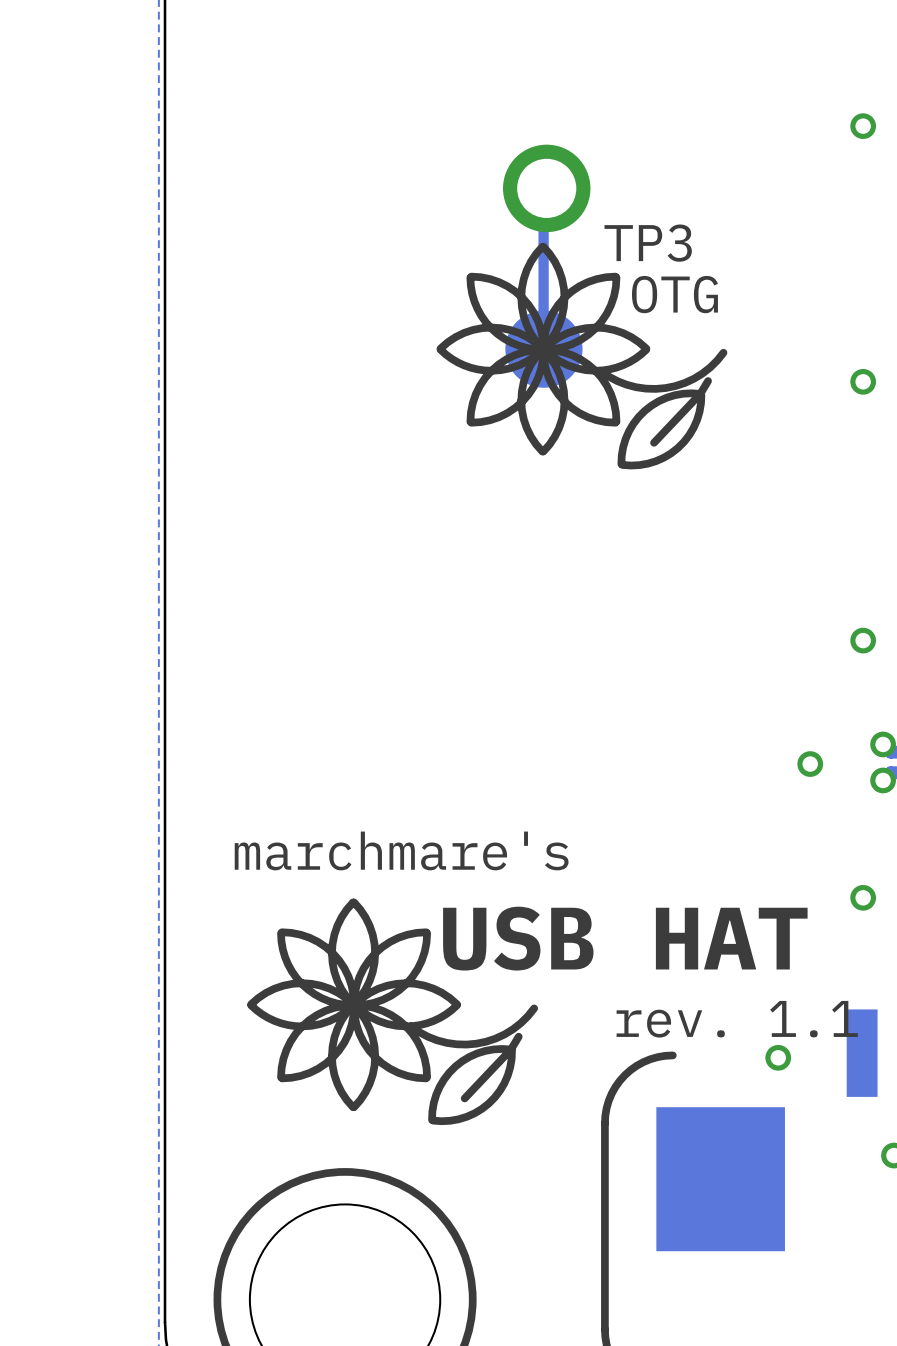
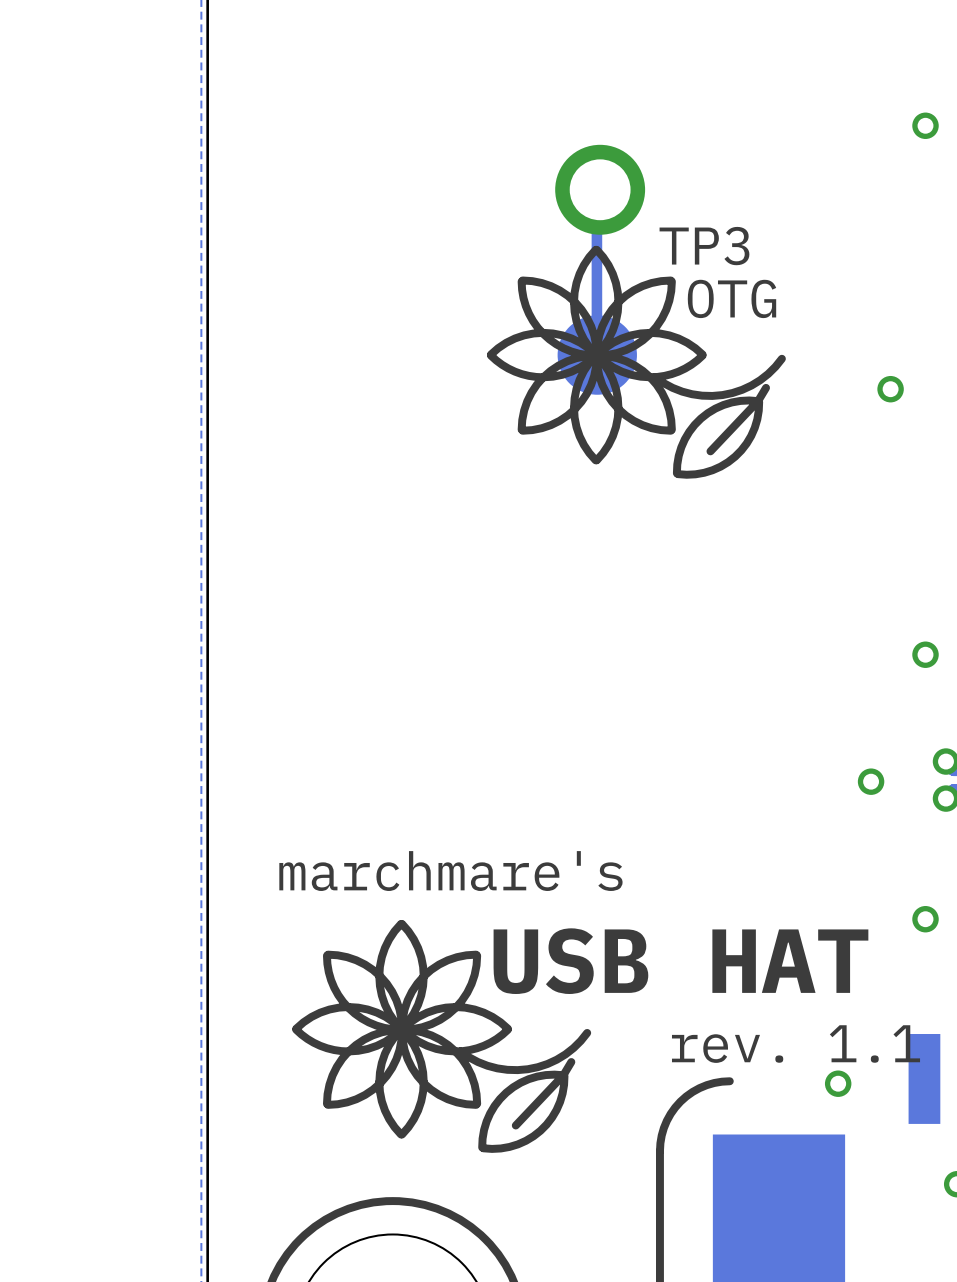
via position: (863, 381) -> (890, 389)

